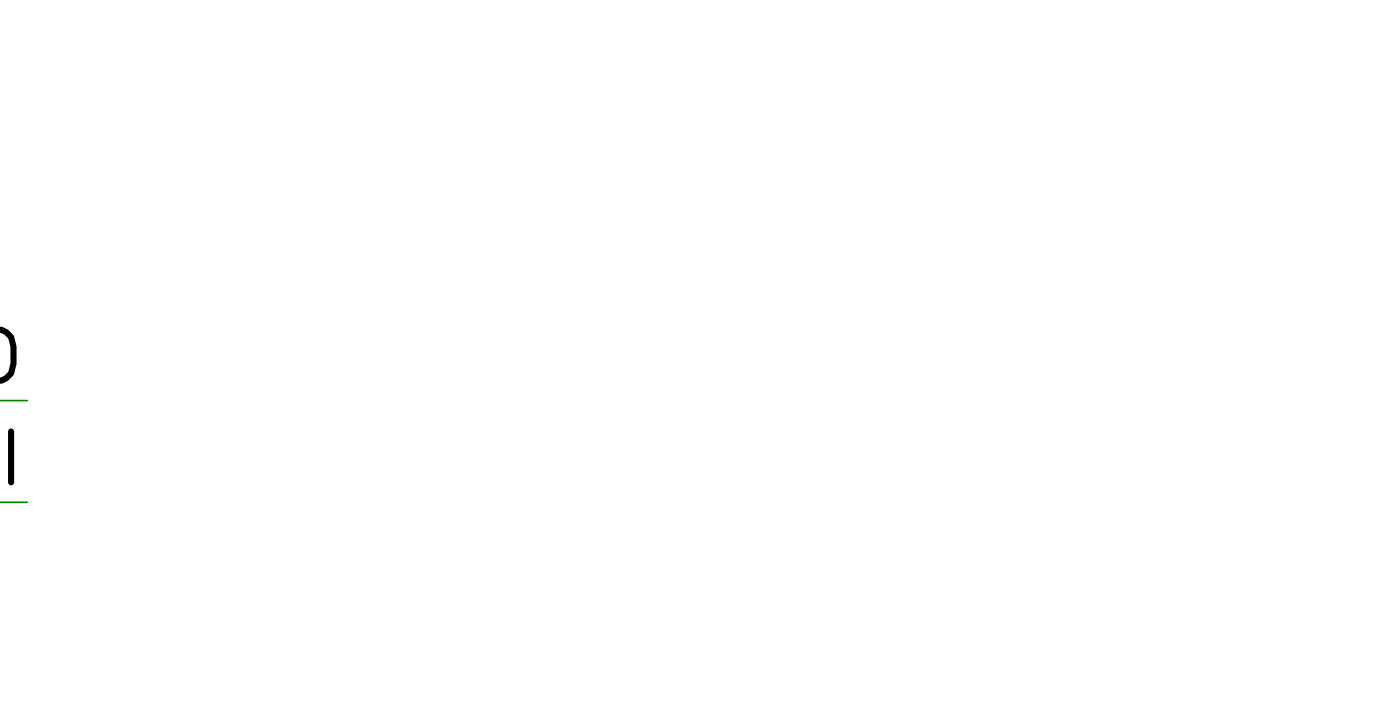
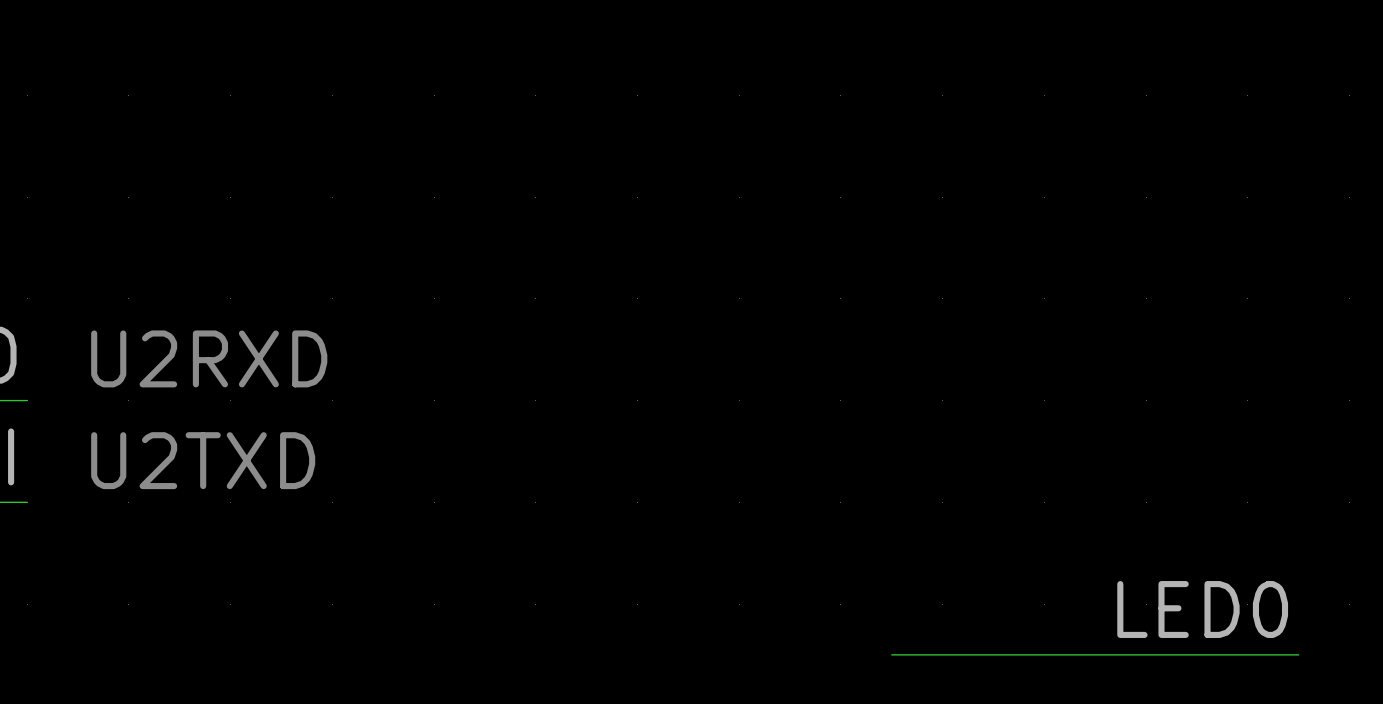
text: none -> U2RXD (209, 358)
text: none -> U2TXD (203, 460)
label: none -> LED0 (1202, 609)
wire: none -> (891, 654) (1298, 654)

